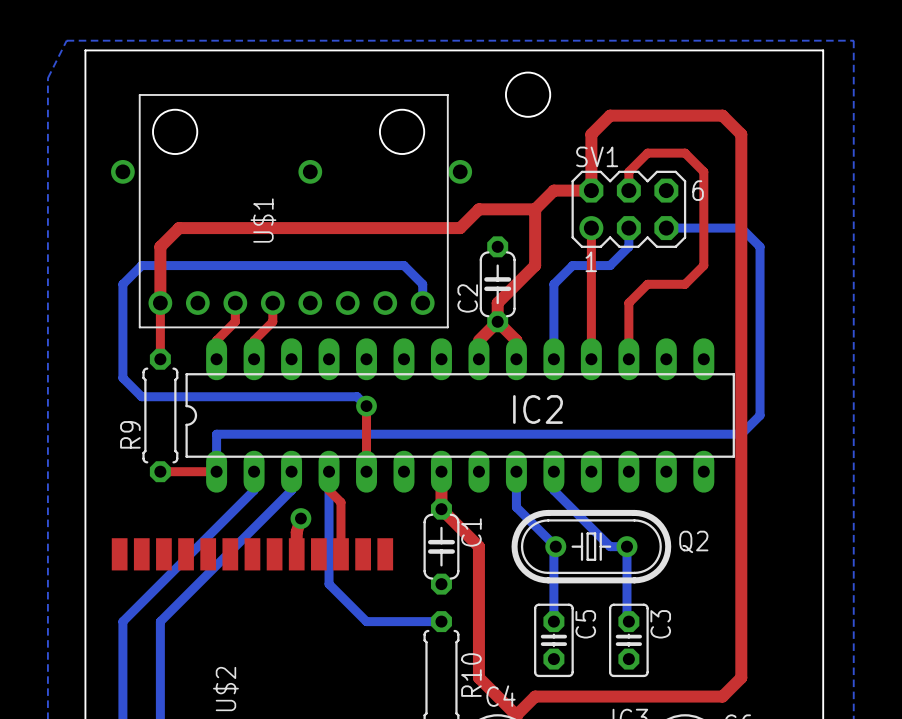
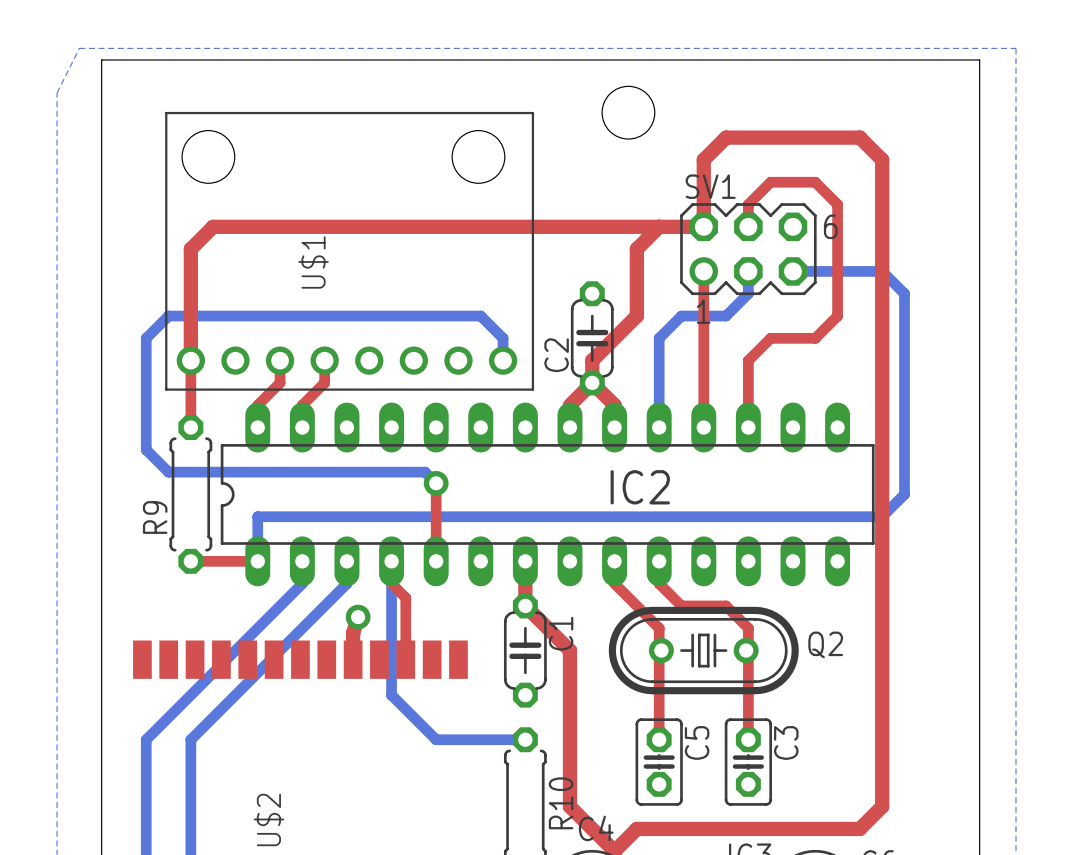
via: (122, 171) -> none
via: (310, 171) -> none
via: (460, 171) -> none
top track: (535, 209) (478, 209) (460, 228) (179, 228) (160, 246) -> (659, 226) (213, 226) (190, 249) (190, 293)
top track: none -> (614, 561) (614, 583) (659, 628) (659, 739)
bottom track: (516, 471) (516, 507) (555, 546) (553, 548) (553, 621) -> none
top track: none -> (659, 561) (659, 583) (681, 605) (726, 605) (748, 628) (748, 739)
bottom track: (553, 471) (553, 490) (610, 546) (626, 546) (626, 619) (628, 621) -> none

